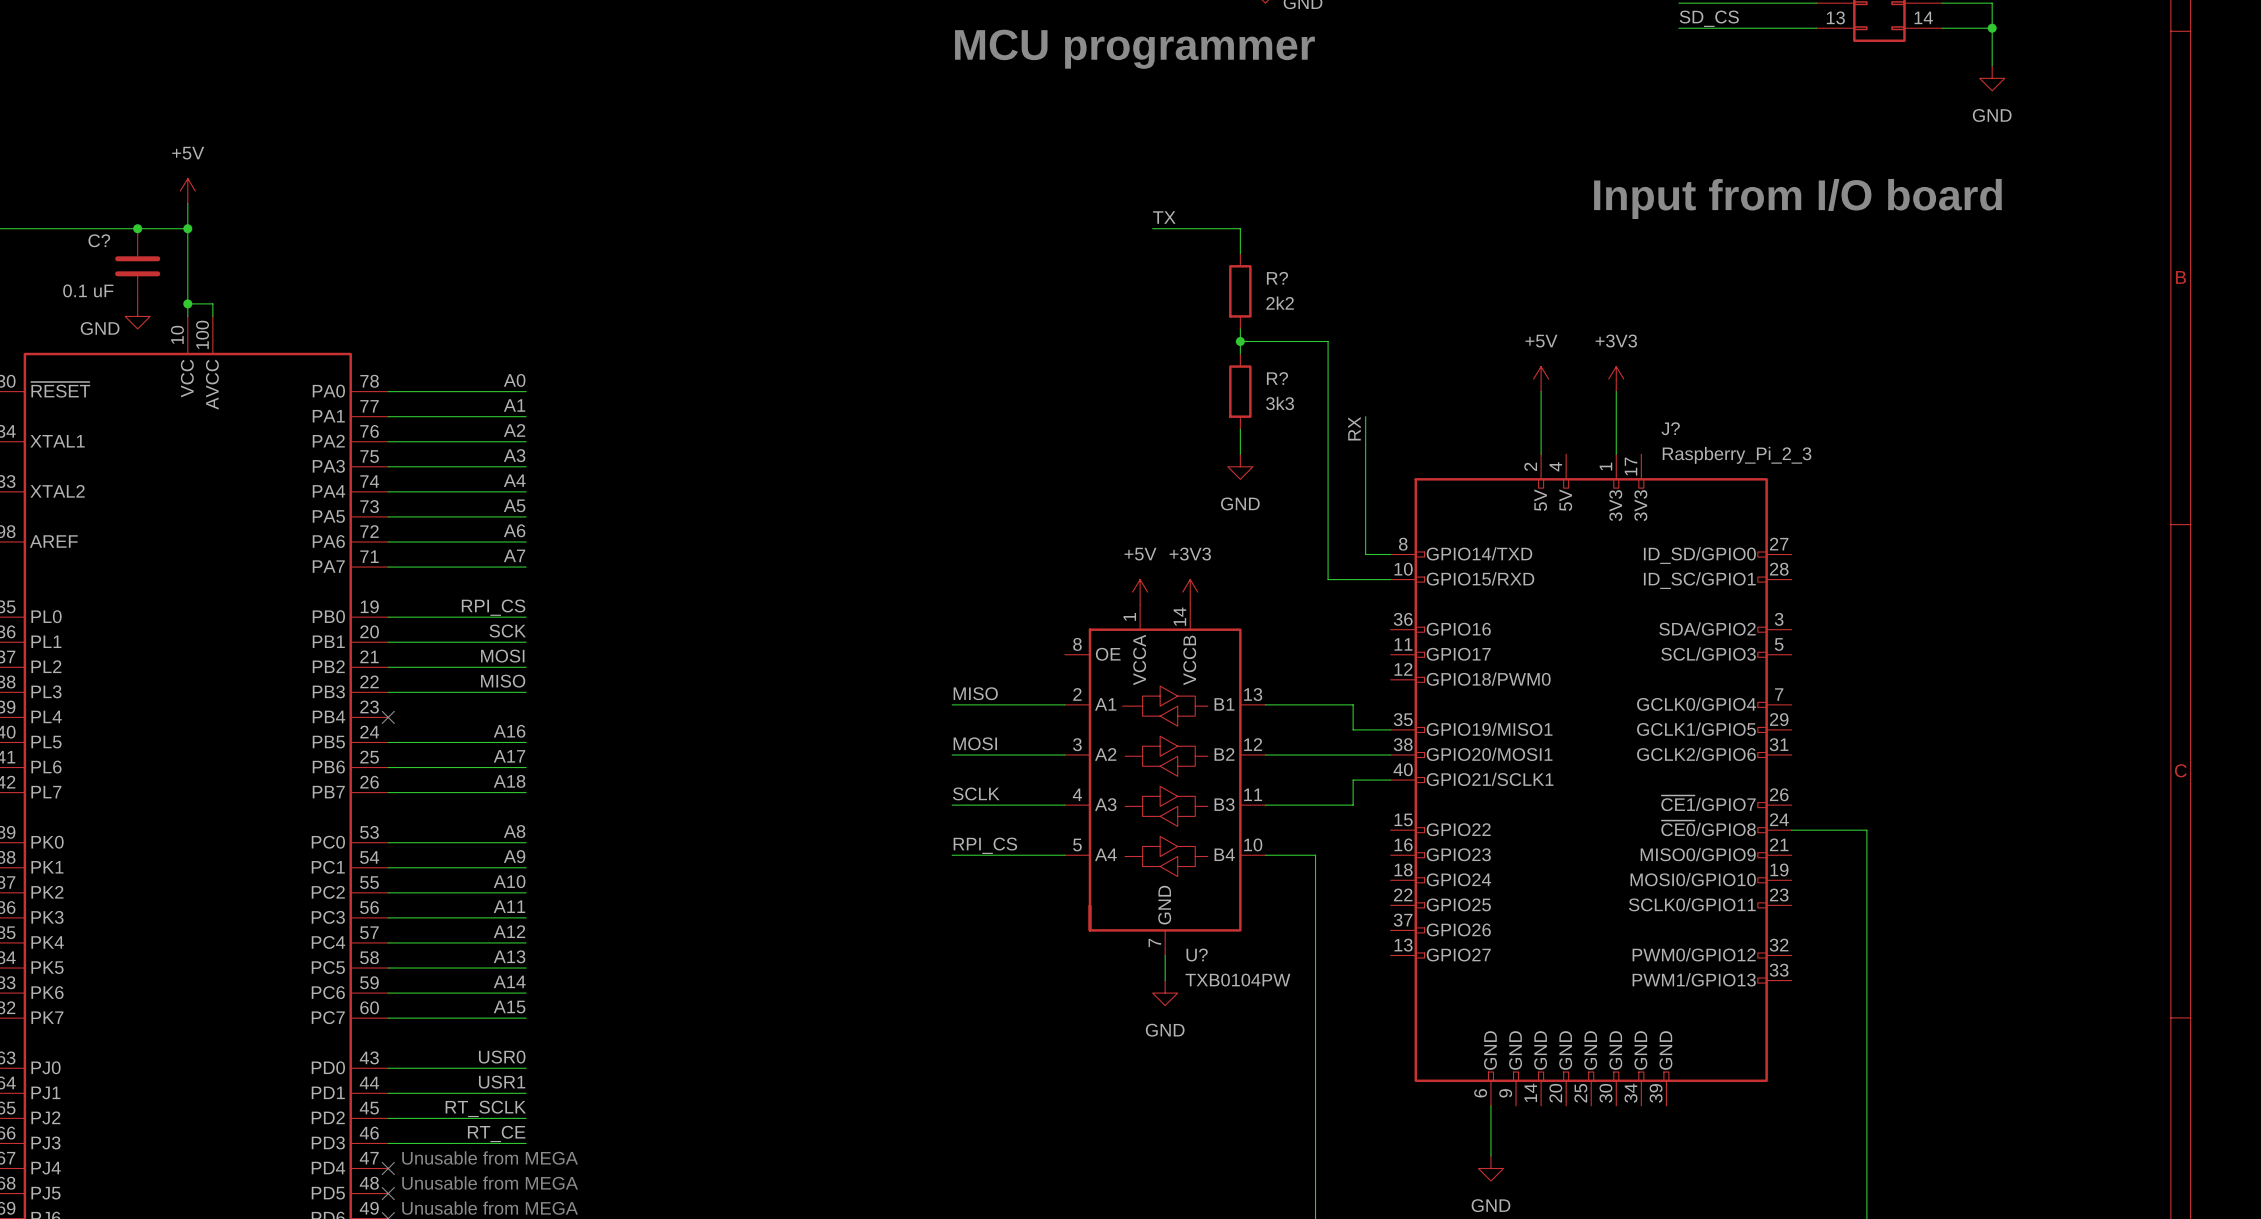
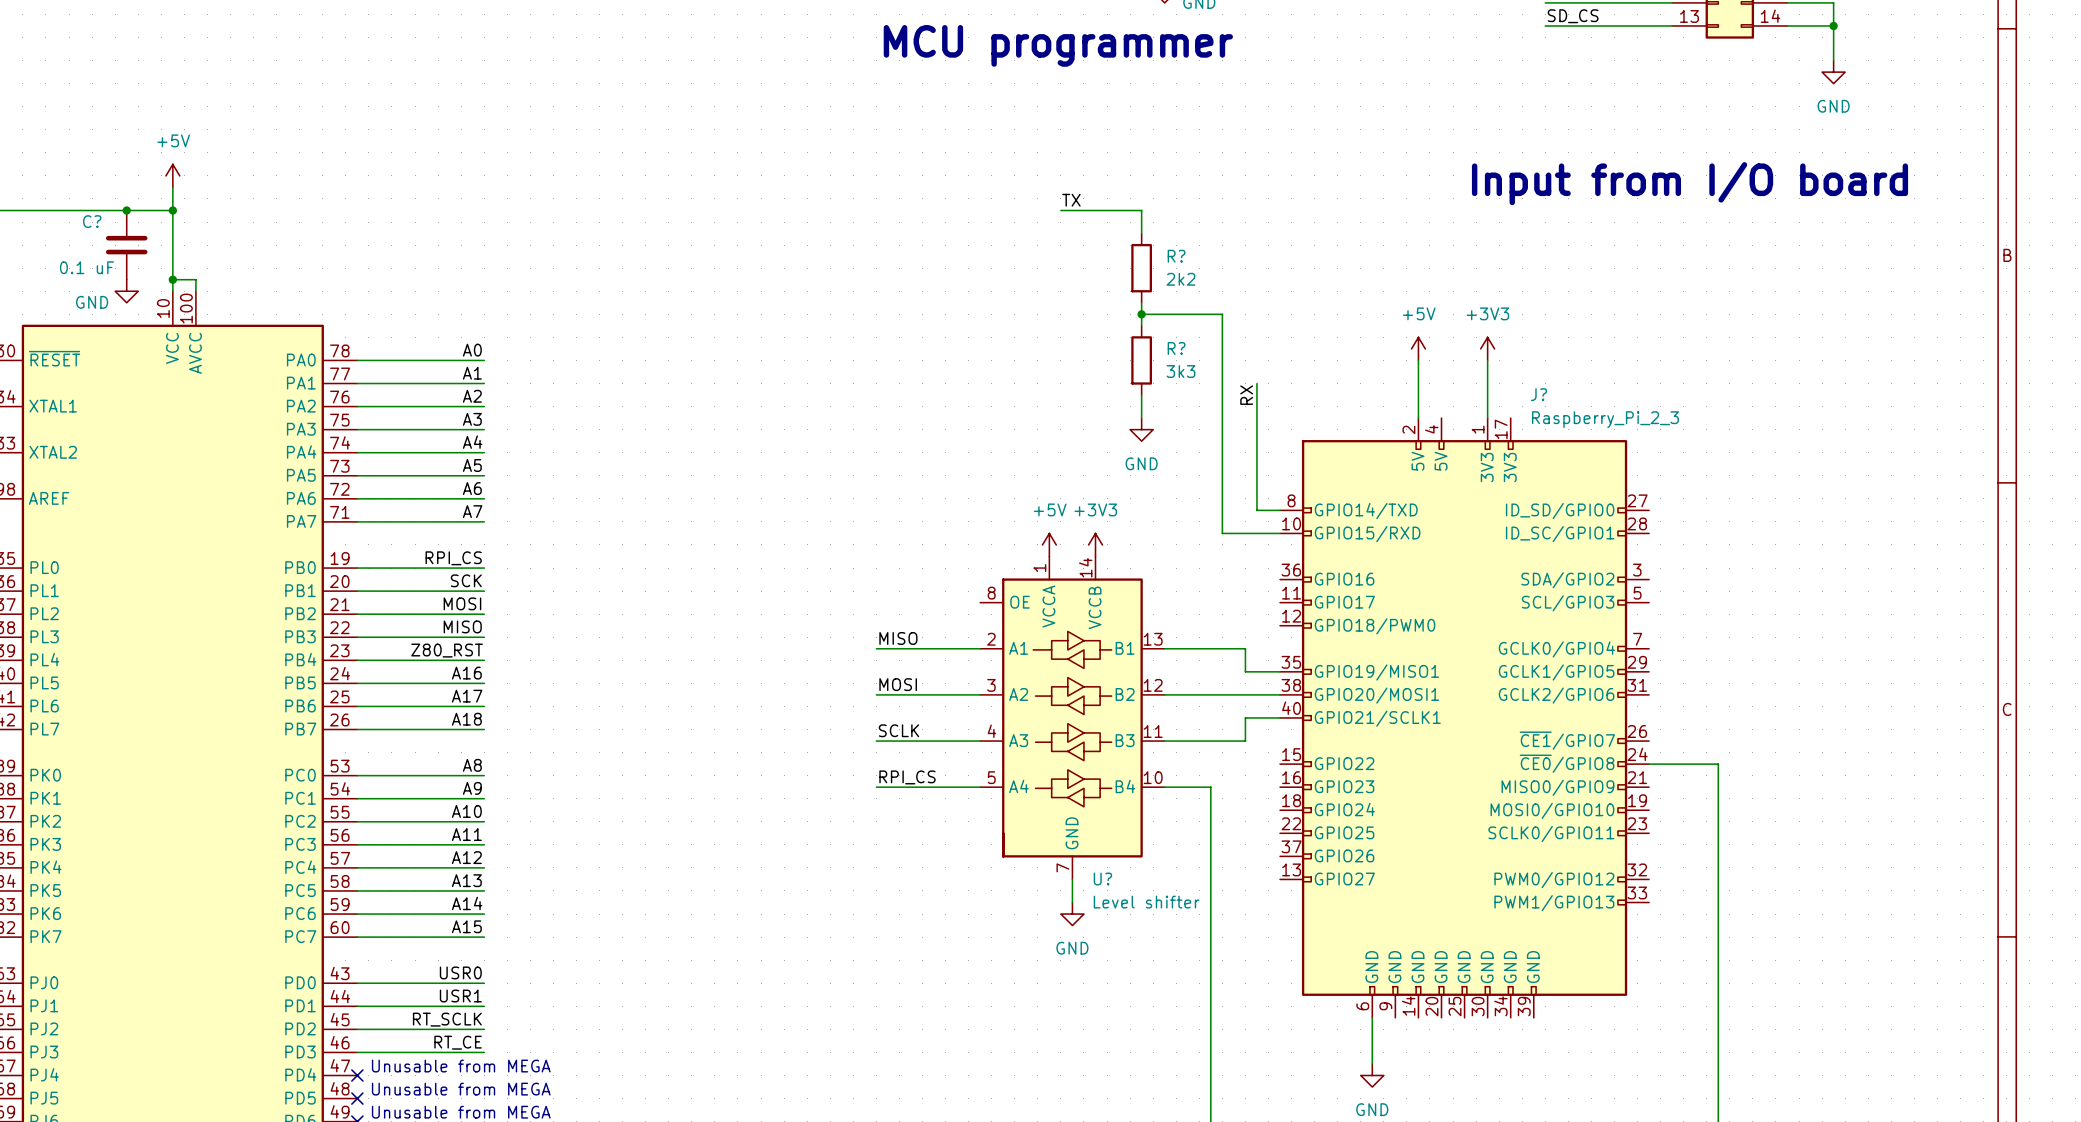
label: none -> Z80_RST (447, 650)
wire: none -> (357, 660) (484, 660)
no-connect mark: (388, 717) -> none
U? value: TXB0104PW (1237, 980) -> Level shifter (1146, 902)

